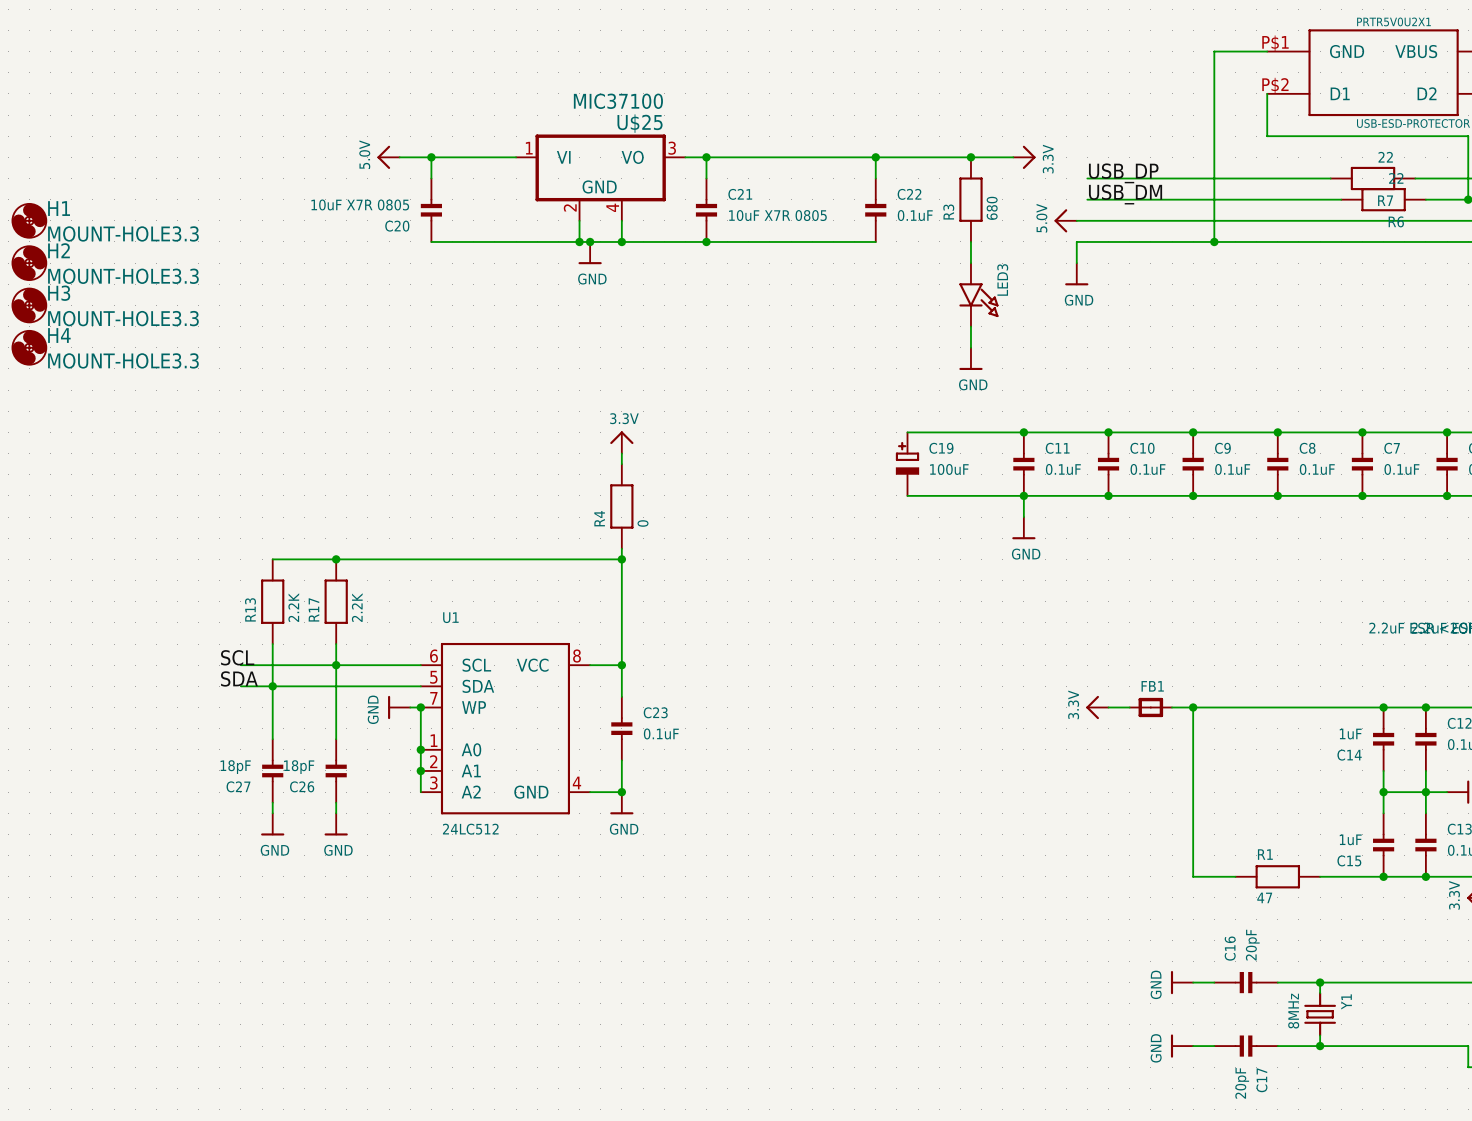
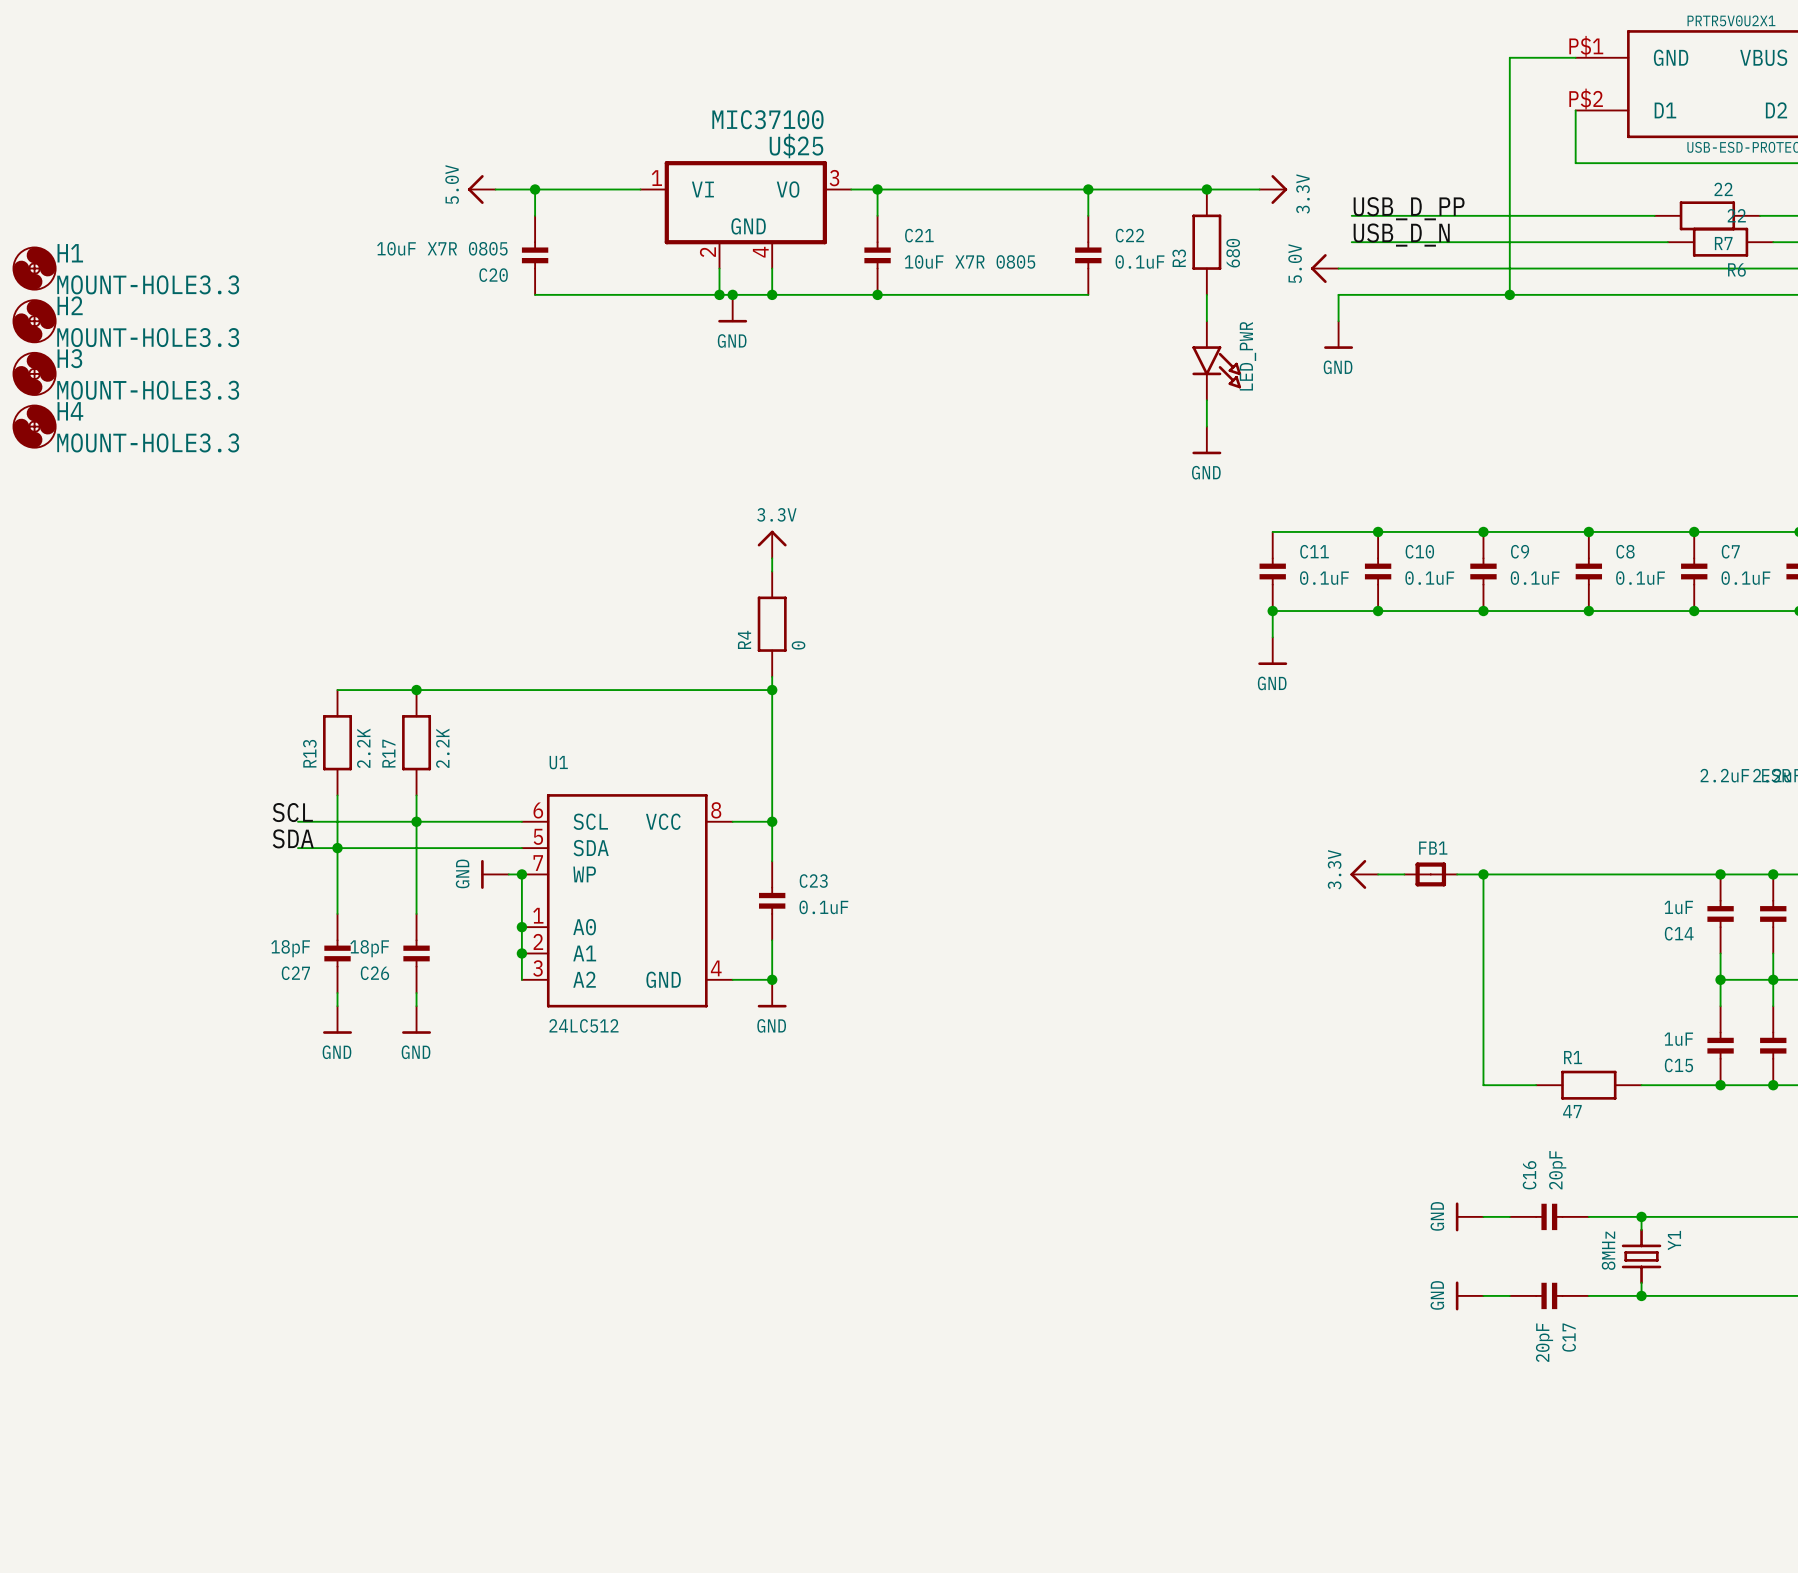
label: USB_DP (1123, 173) -> USB_D_PP (1409, 208)
label: USB_DM (1125, 194) -> USB_D_N (1401, 235)
LED3 name: LED3 (1002, 279) -> LED_PWR (1247, 356)
wire: (907, 432) (1023, 432) -> none
junction: (1023, 432) -> none
C19: 100uF (907, 464) -> none
wire: (907, 495) (1023, 495) -> none

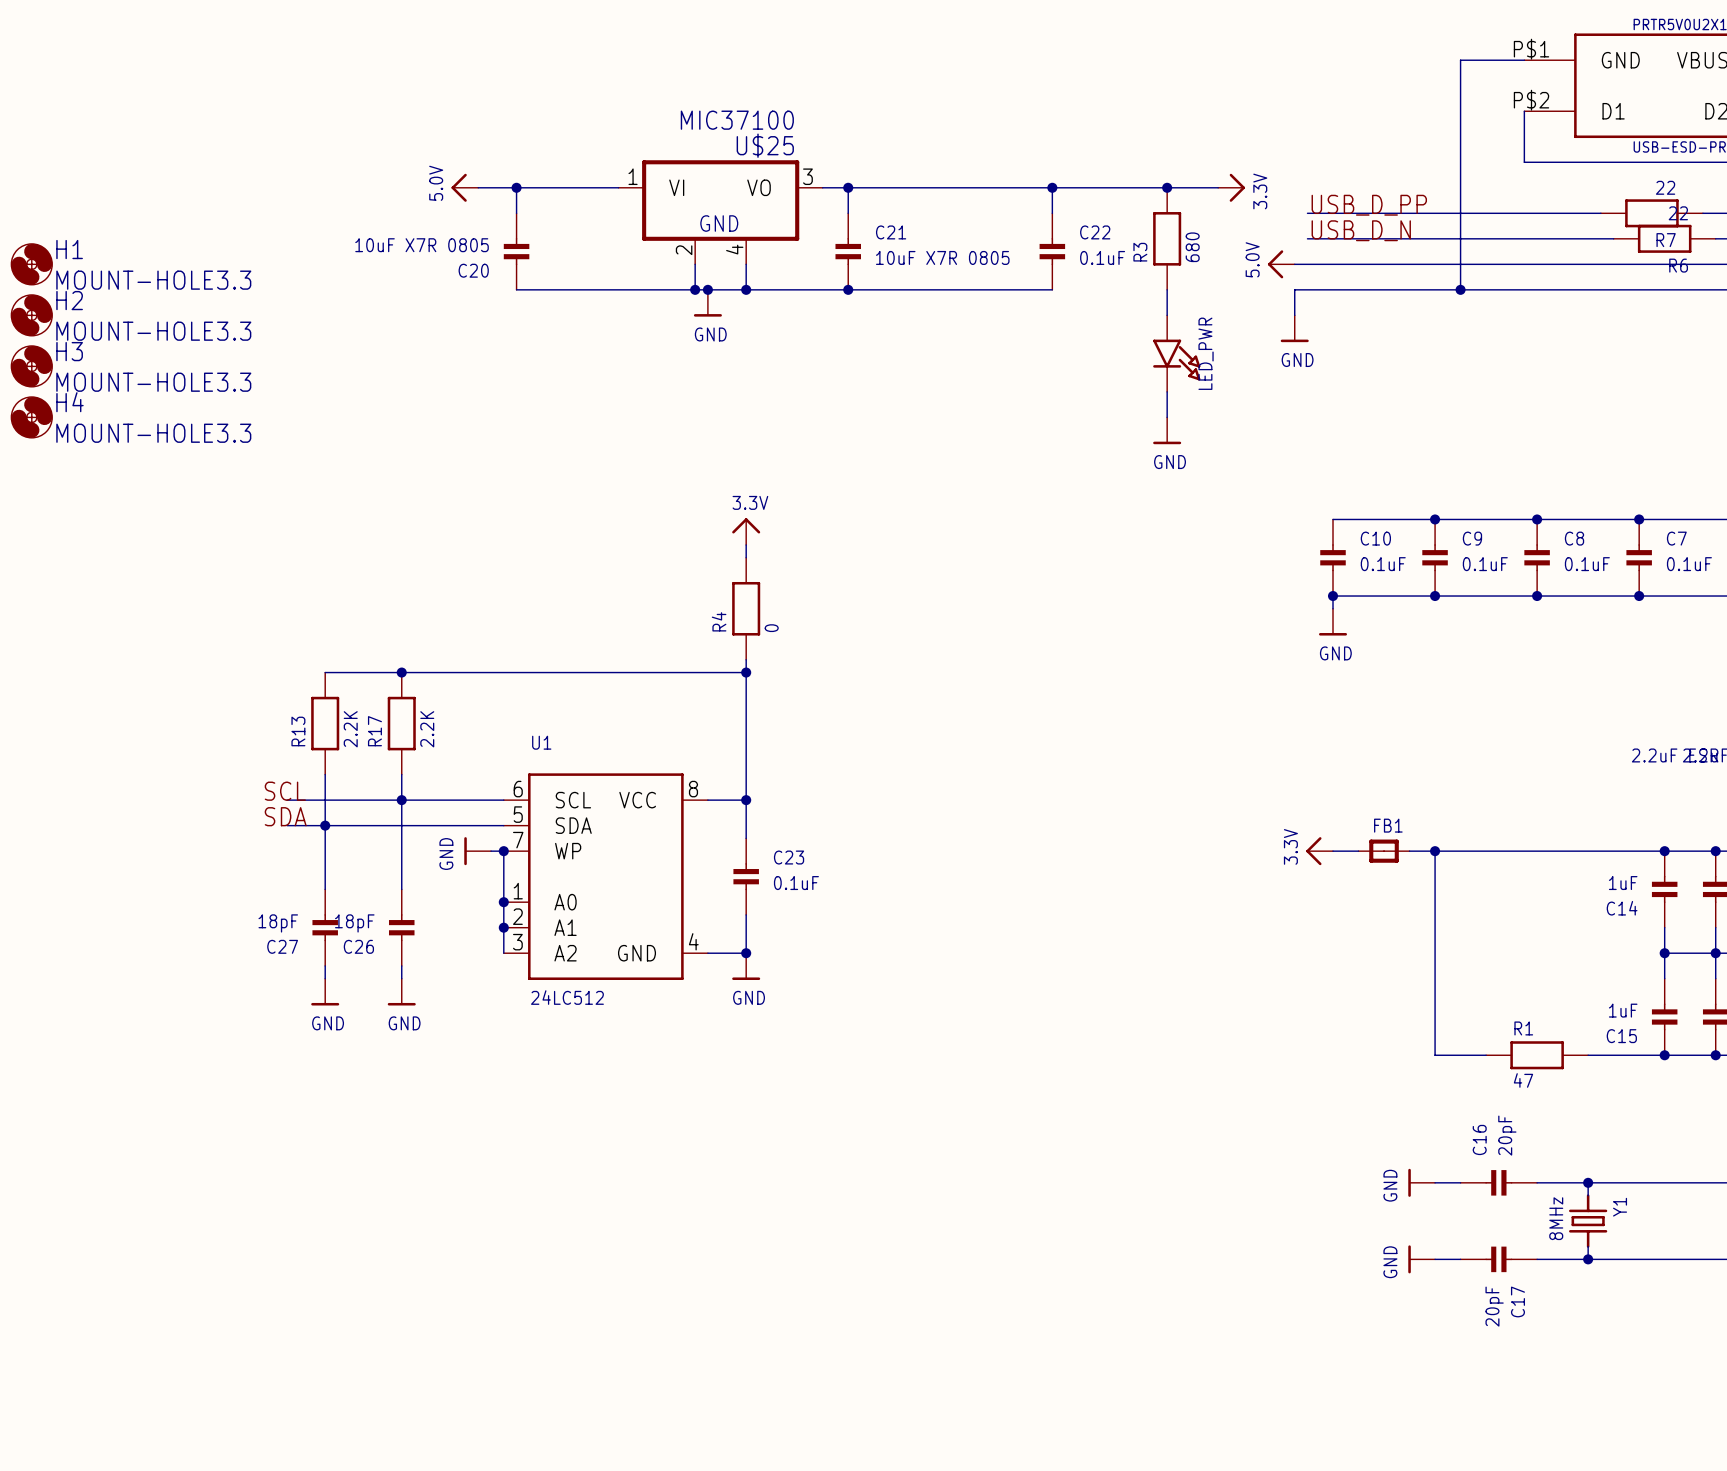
wire: (1272, 531) (1378, 531) -> none
junction: (1378, 531) -> none
C11: 0.1uF (1272, 571) -> none
junction: (1272, 611) -> none
wire: (1378, 611) (1272, 611) (1272, 637) -> (1333, 596) (1333, 608)
power symbol position: GND (1272, 651) -> GND (1333, 622)

